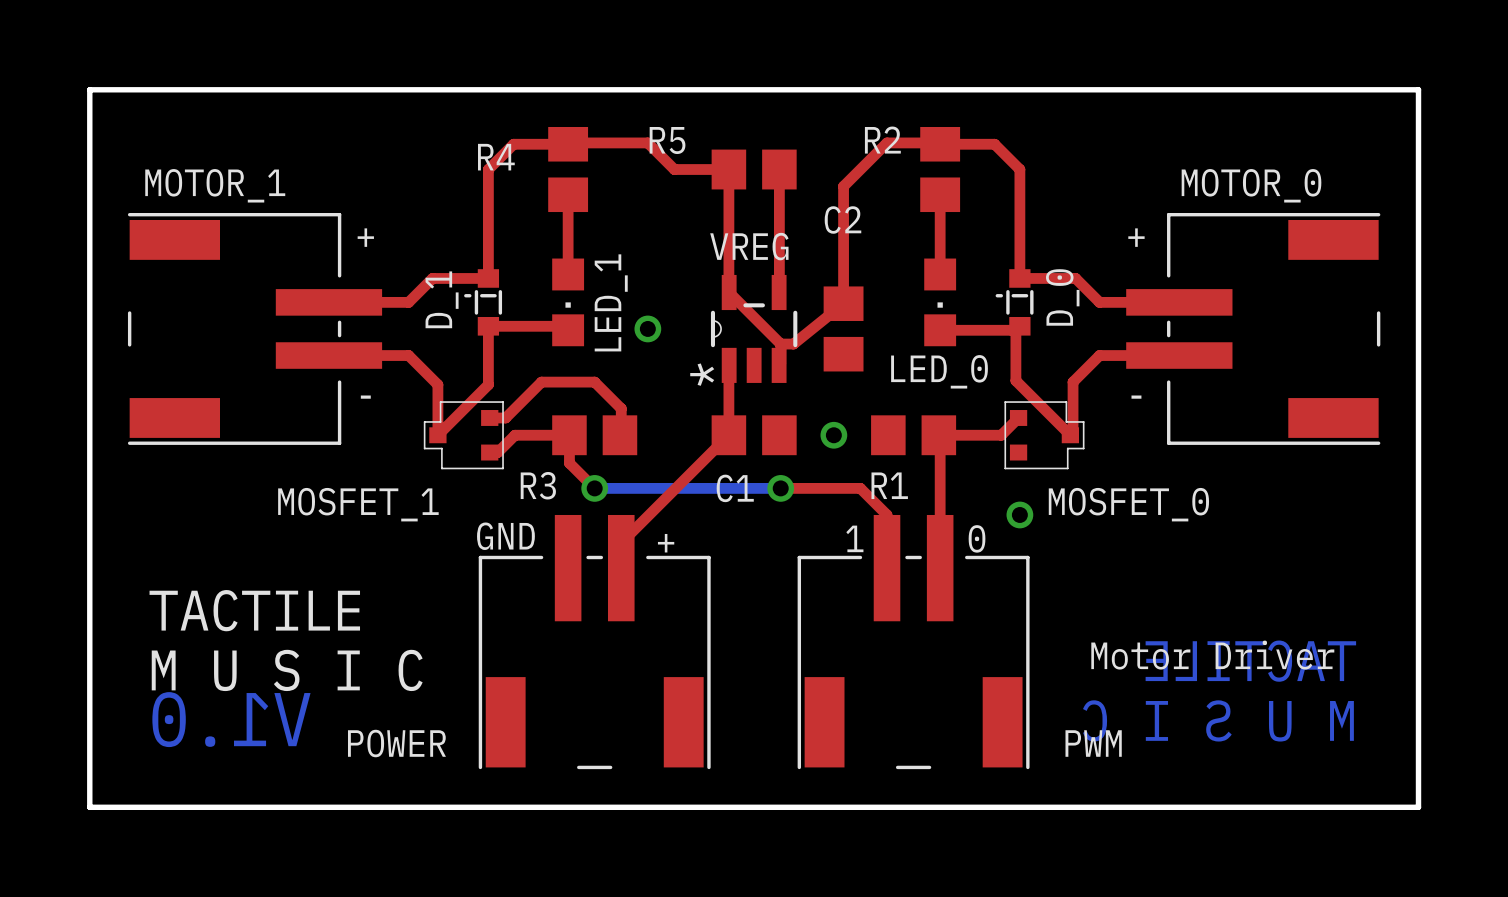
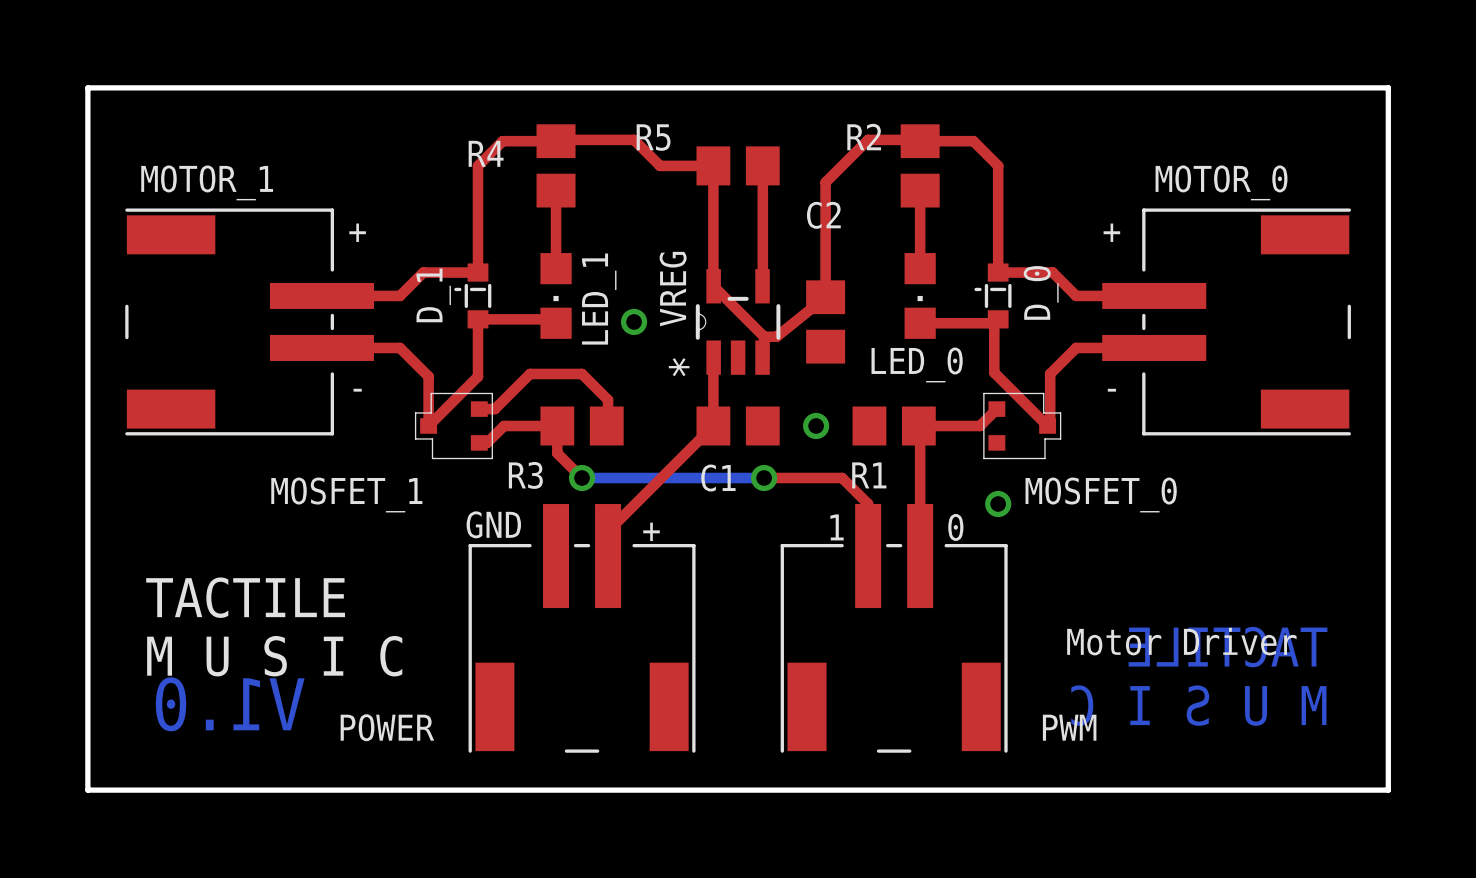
VREG name rotation: 0° (749, 246) -> 90° counterclockwise (673, 289)

